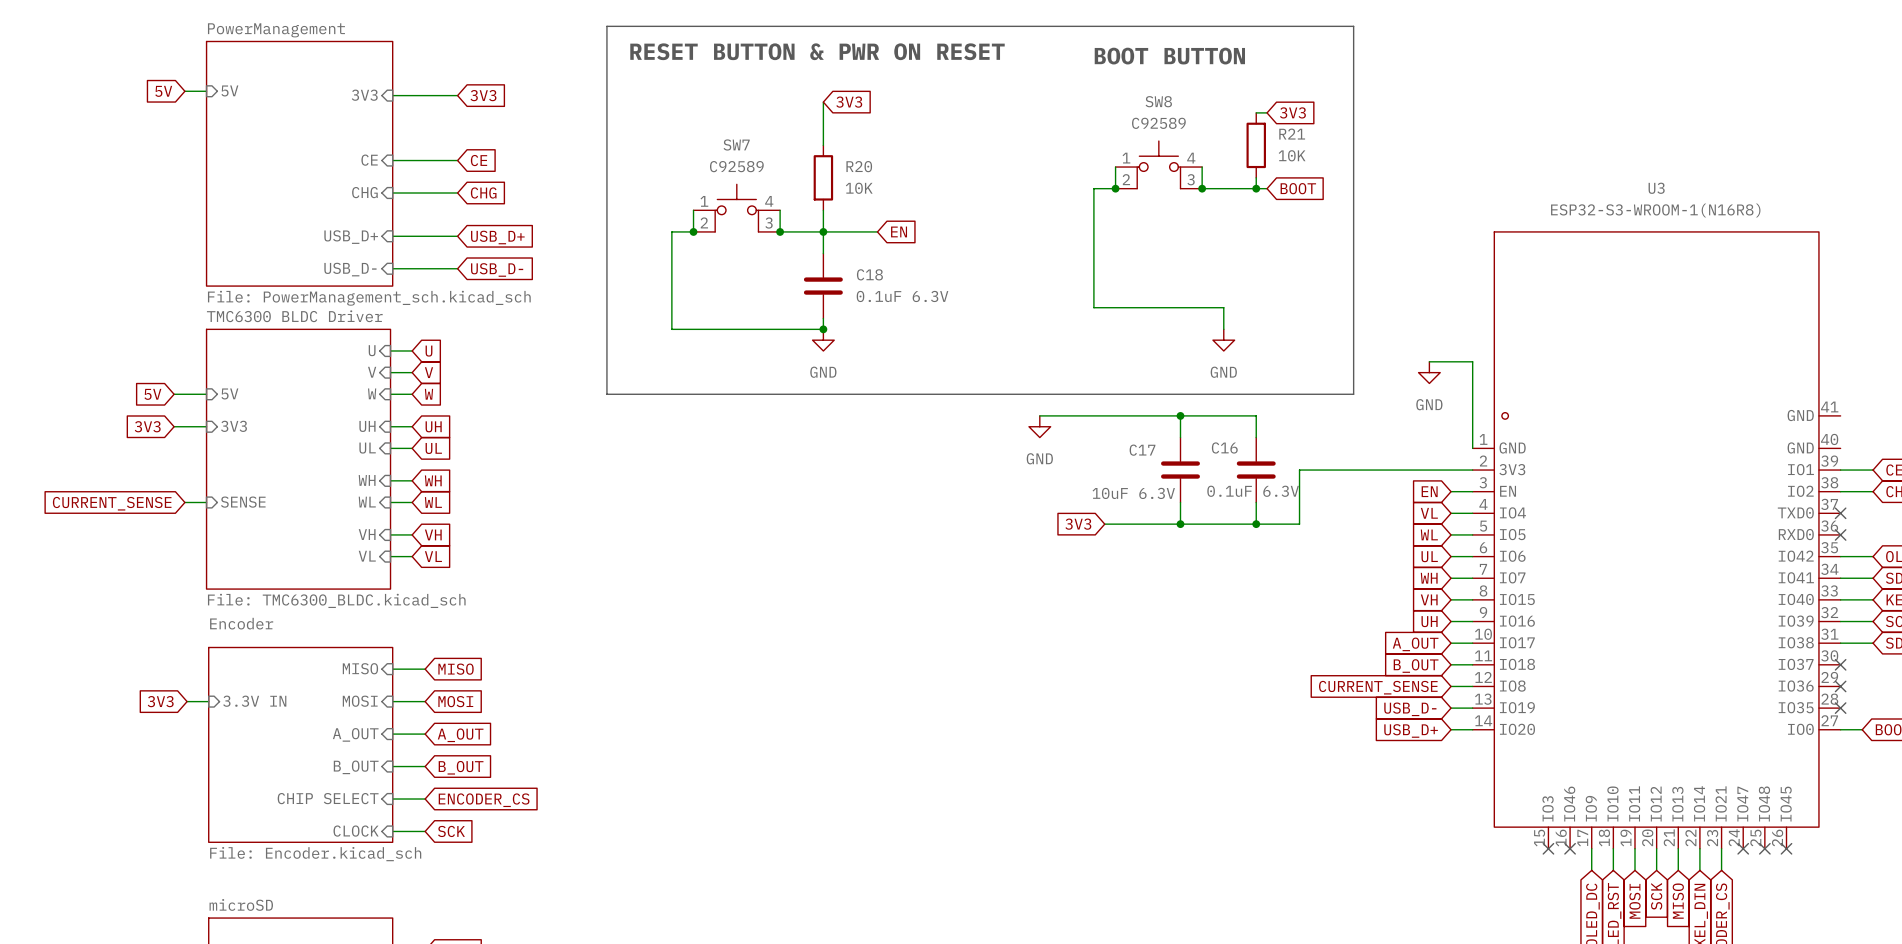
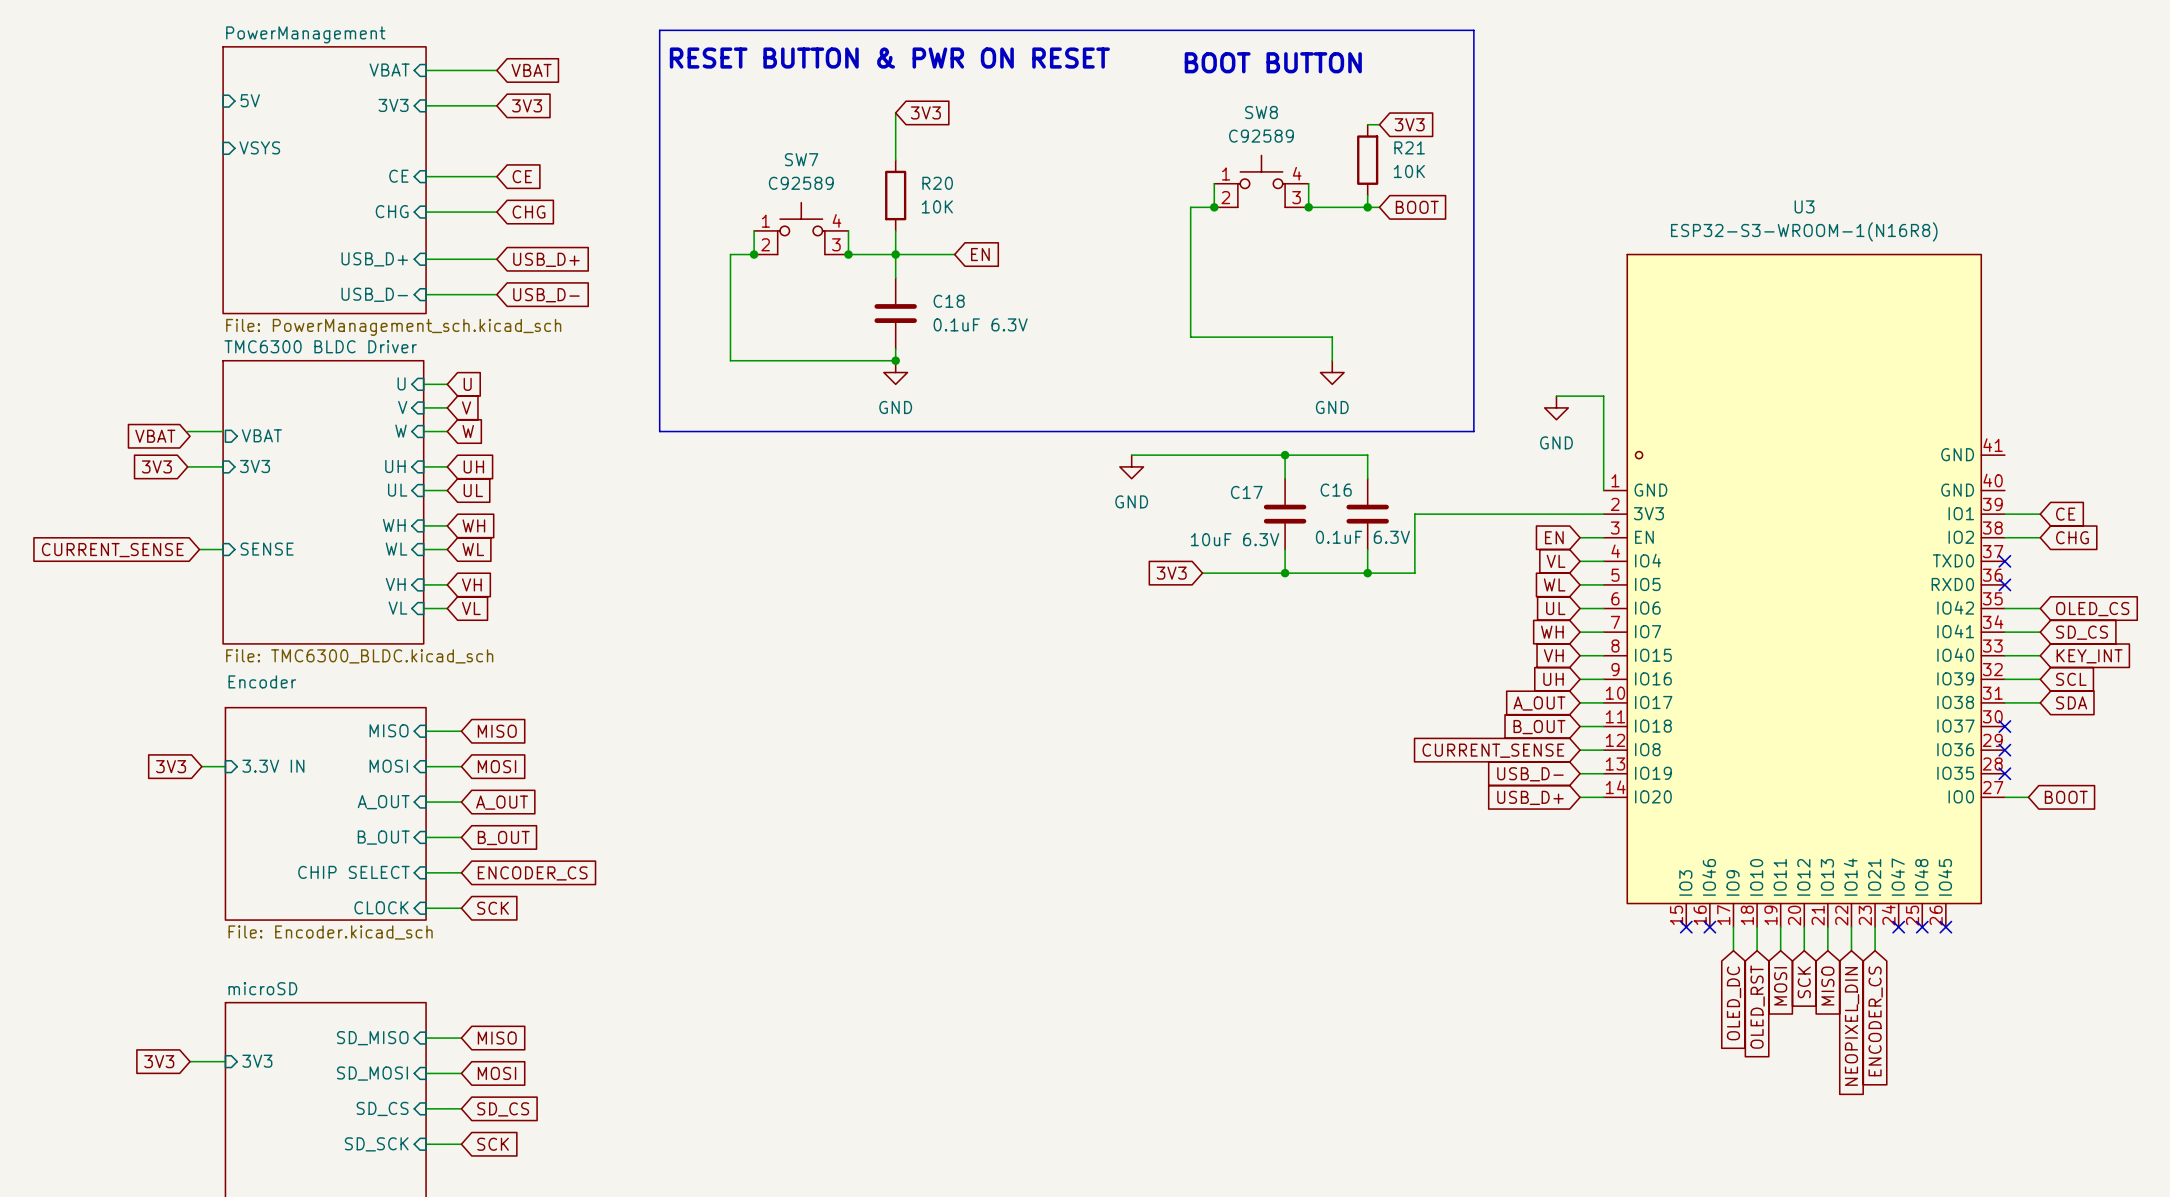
sheet pin: none -> VBAT (389, 70)
wire: none -> (426, 70) (496, 70)
global label: none -> VBAT (531, 70)
global label: 5V (163, 91) -> none
wire: (184, 91) (206, 91) -> none
sheet pin: none -> VSYS (259, 147)
sheet pin: 5V (229, 393) -> VBAT (261, 435)
global label: 5V (152, 394) -> VBAT (155, 436)

